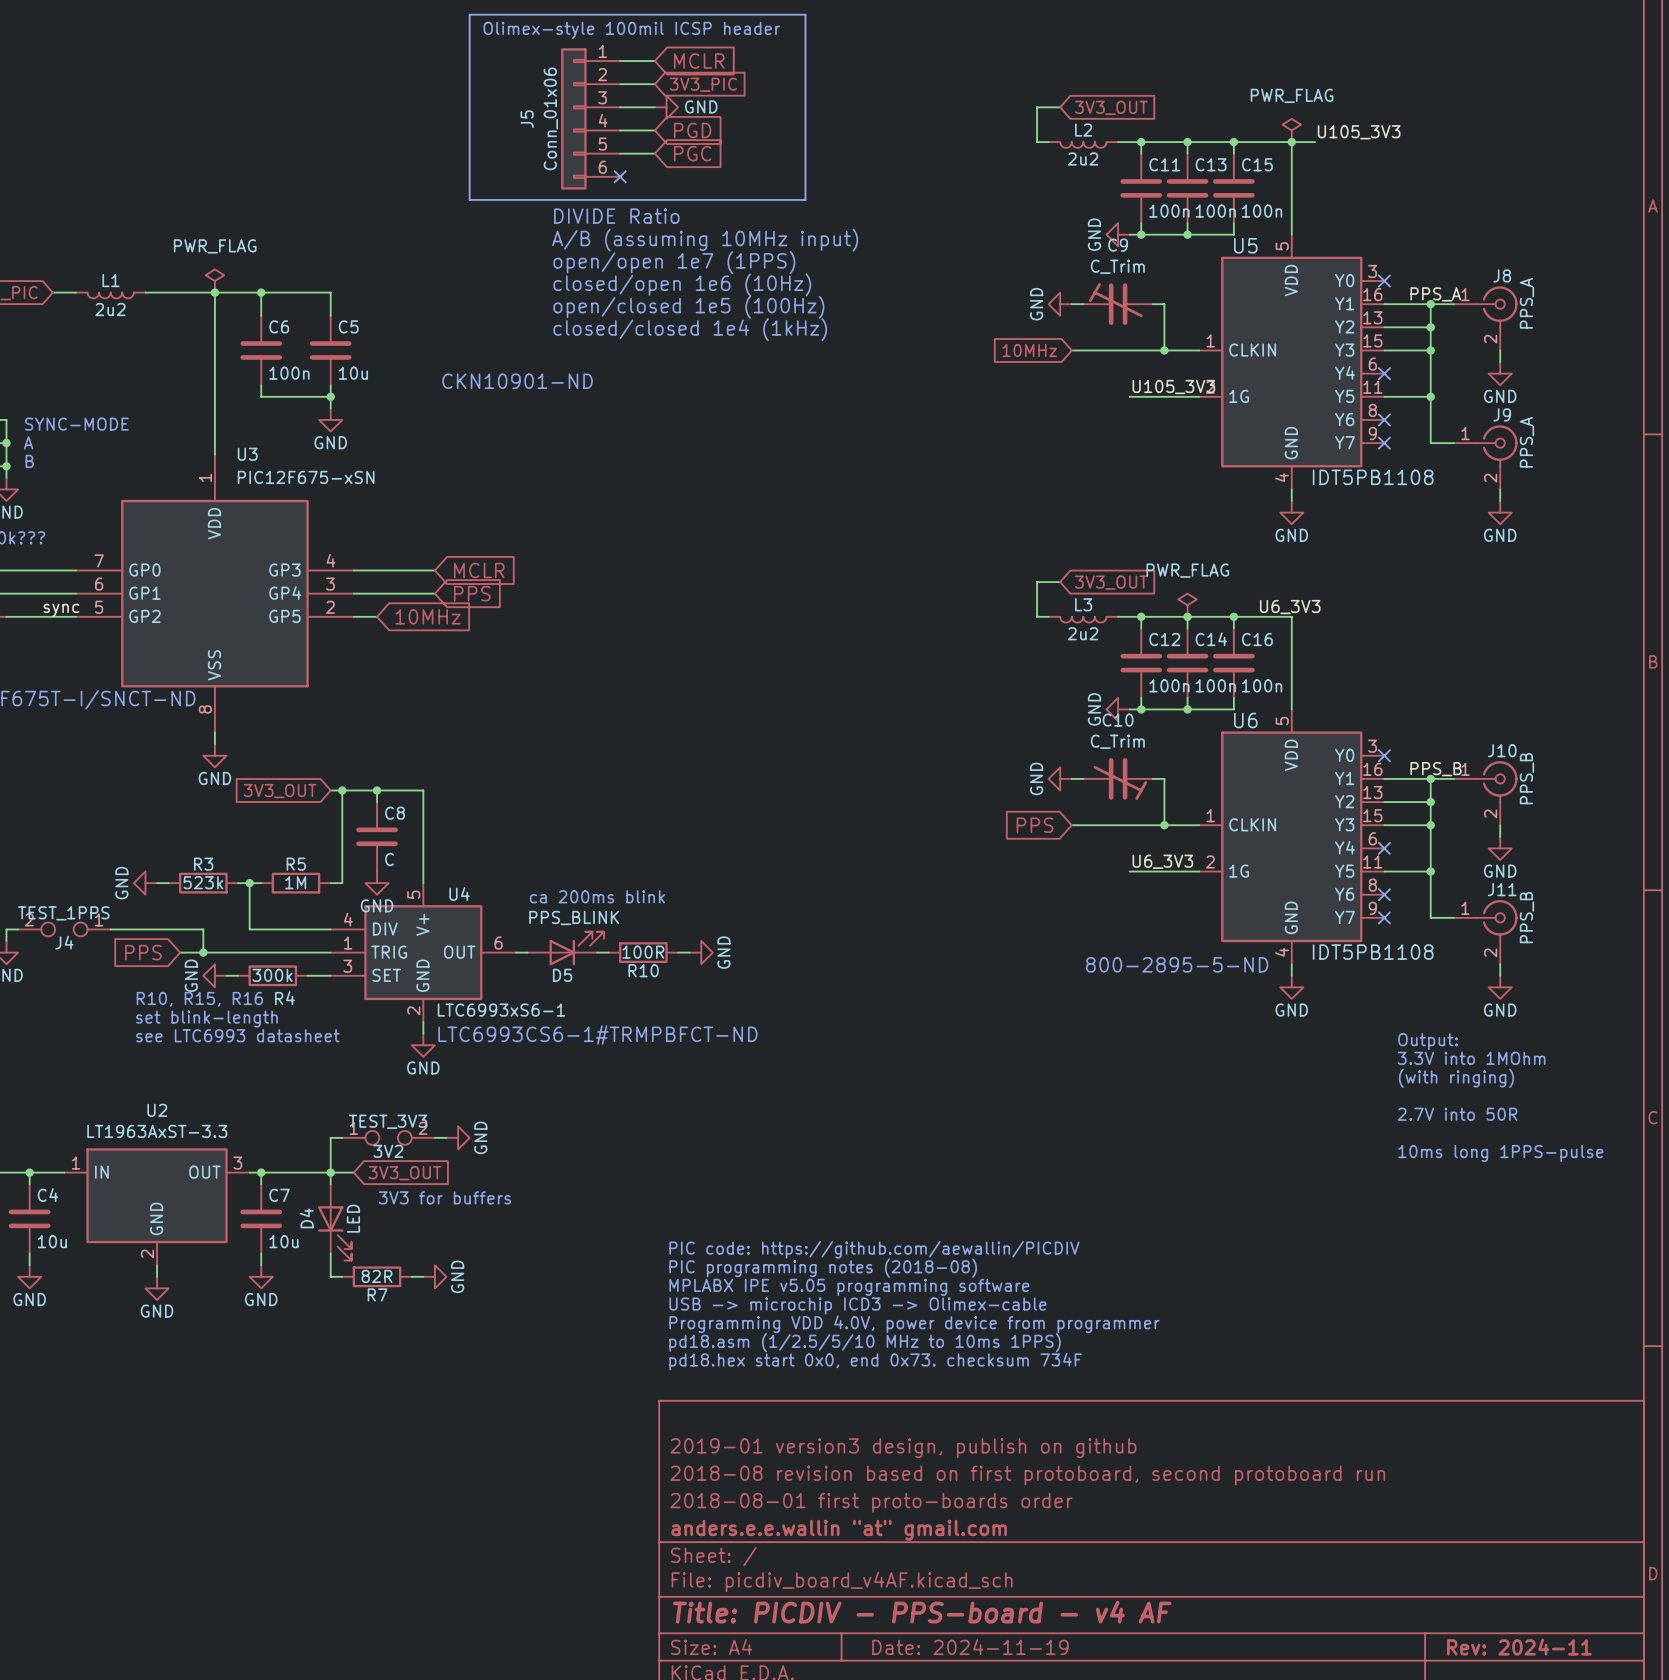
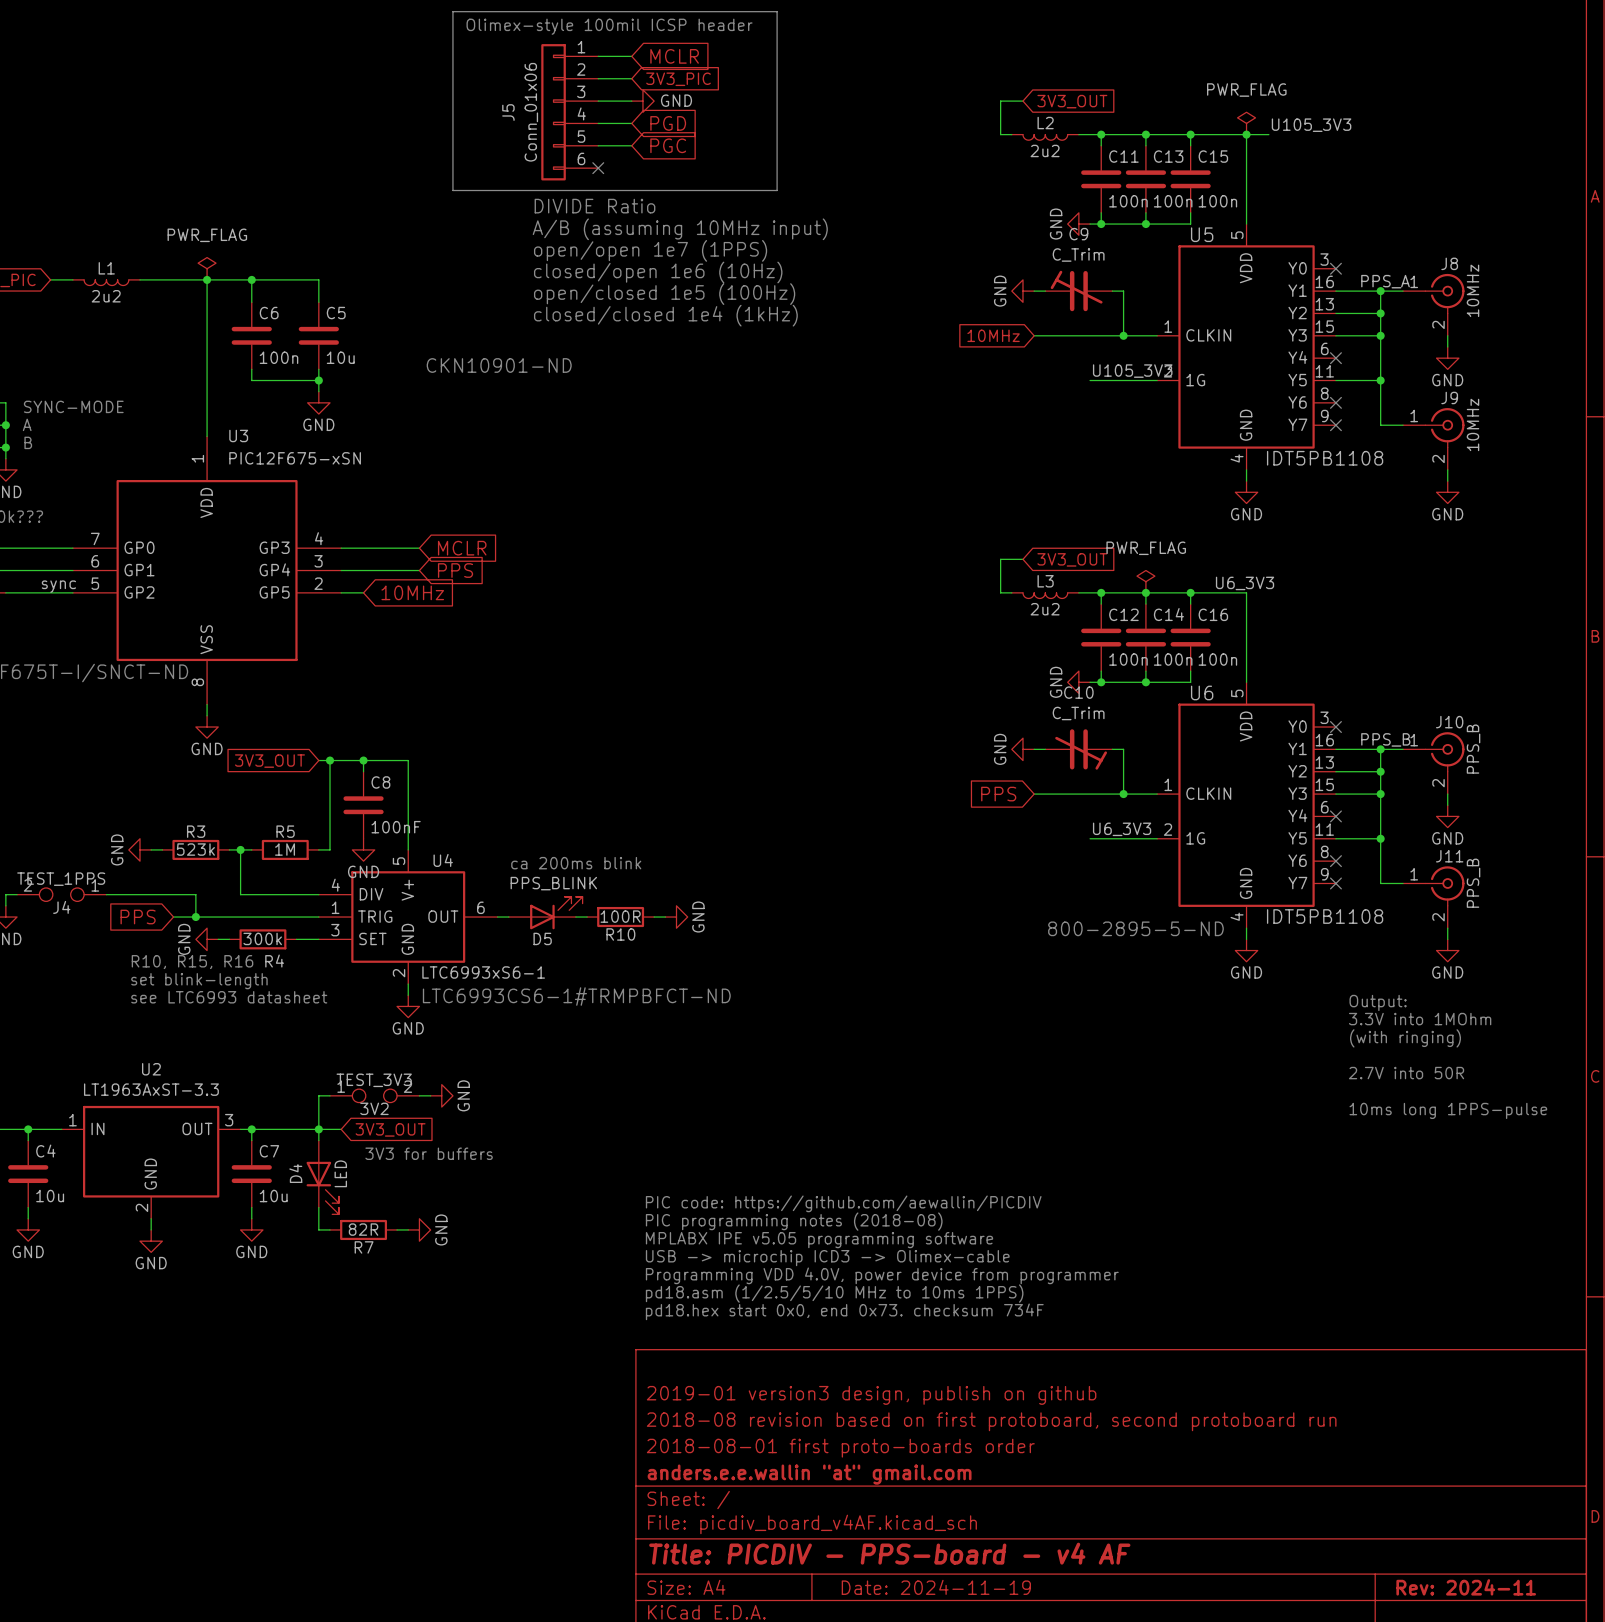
J8 value: PPS_A (1526, 303) -> 10MHz (1473, 290)
J9 value: PPS_A (1526, 442) -> 10MHz (1473, 424)
C8 value: C (389, 859) -> 100nF (396, 827)

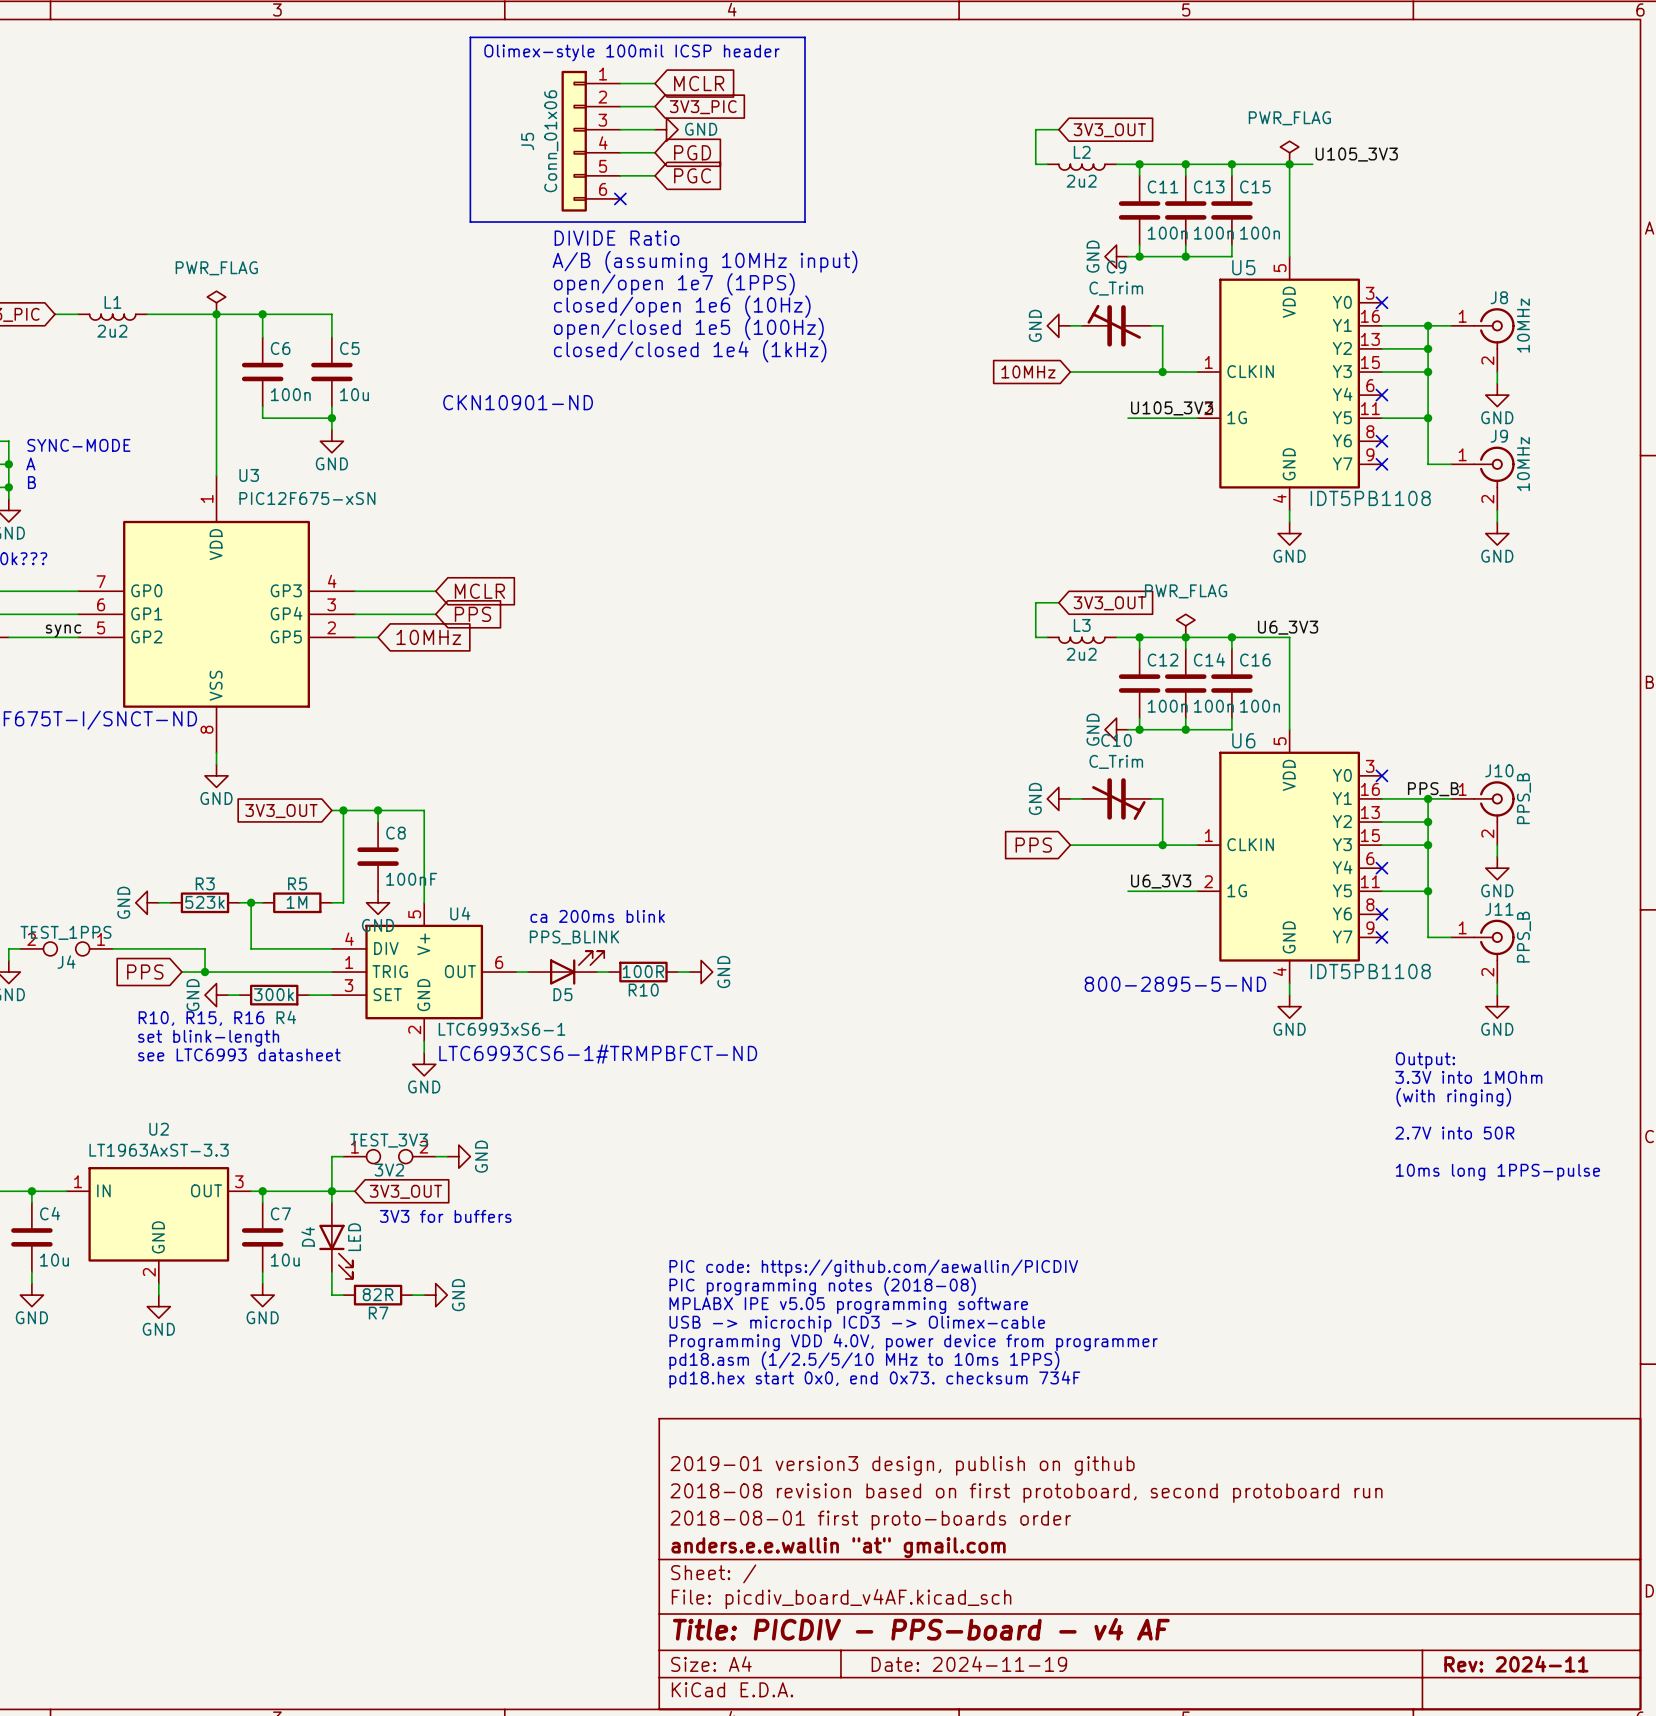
label: PPS_A (1385, 281) -> none

